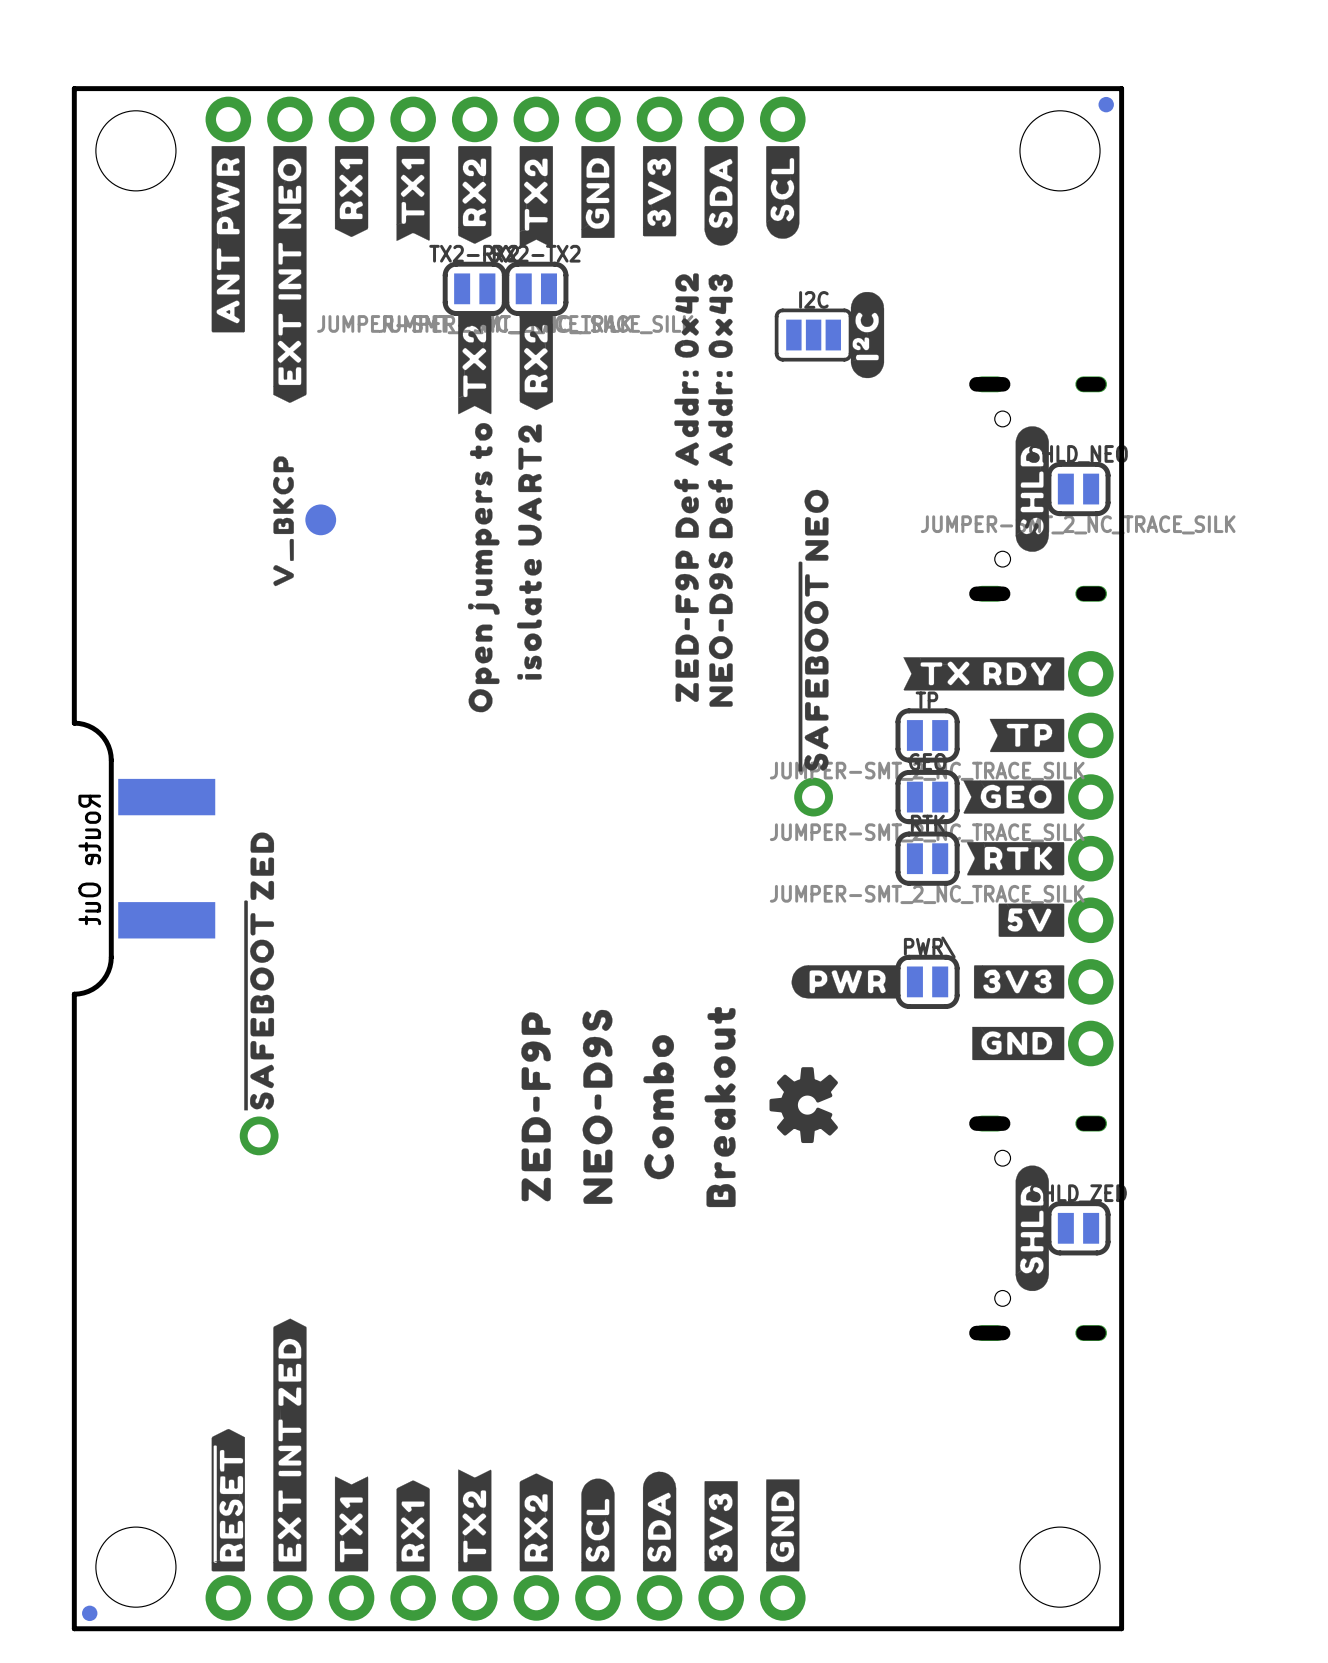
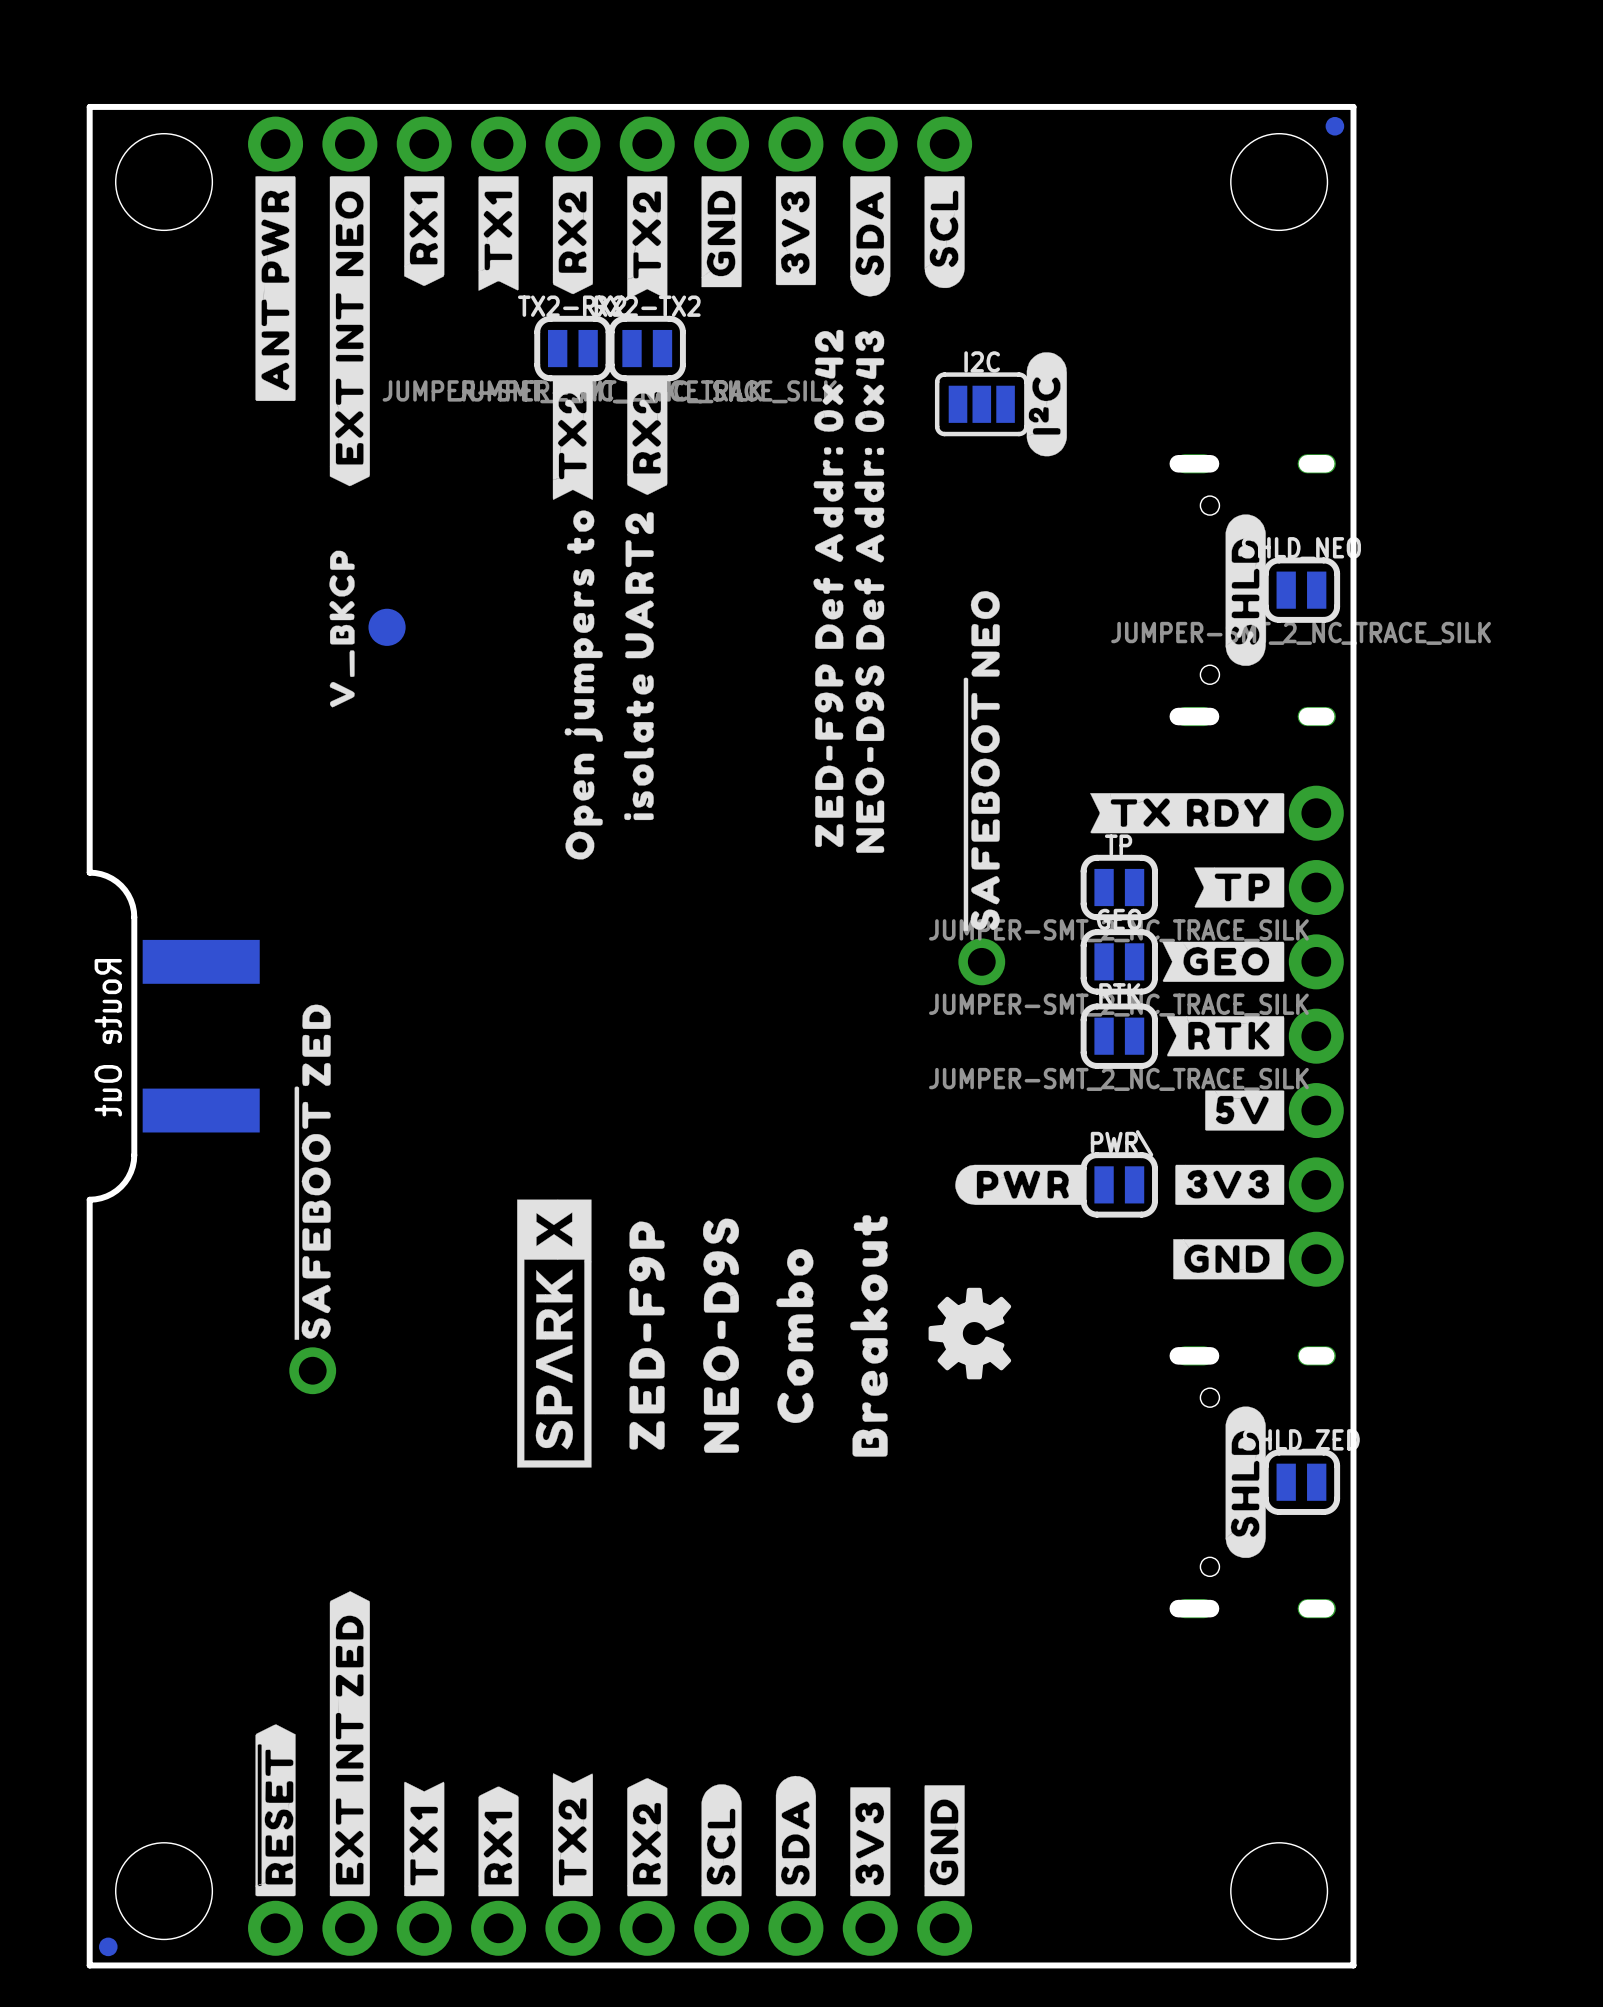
drawing: none -> [517, 1199, 592, 1468]

